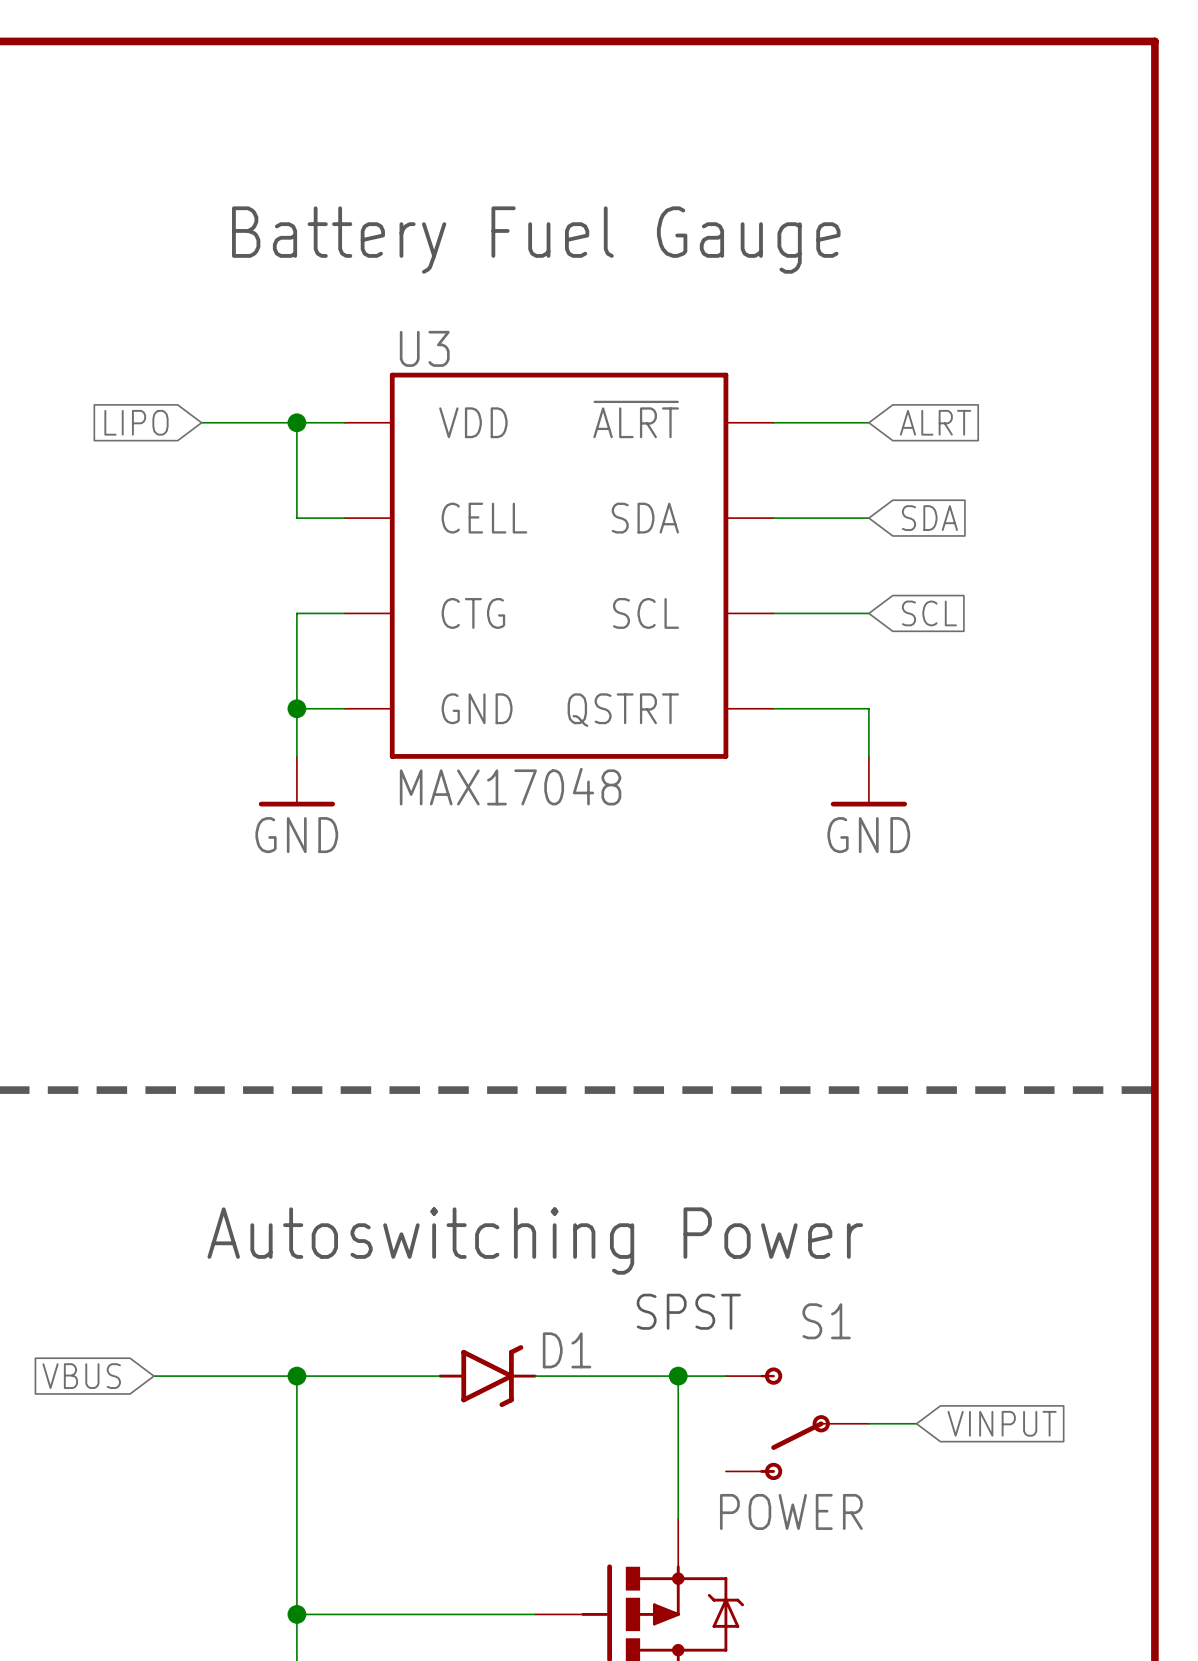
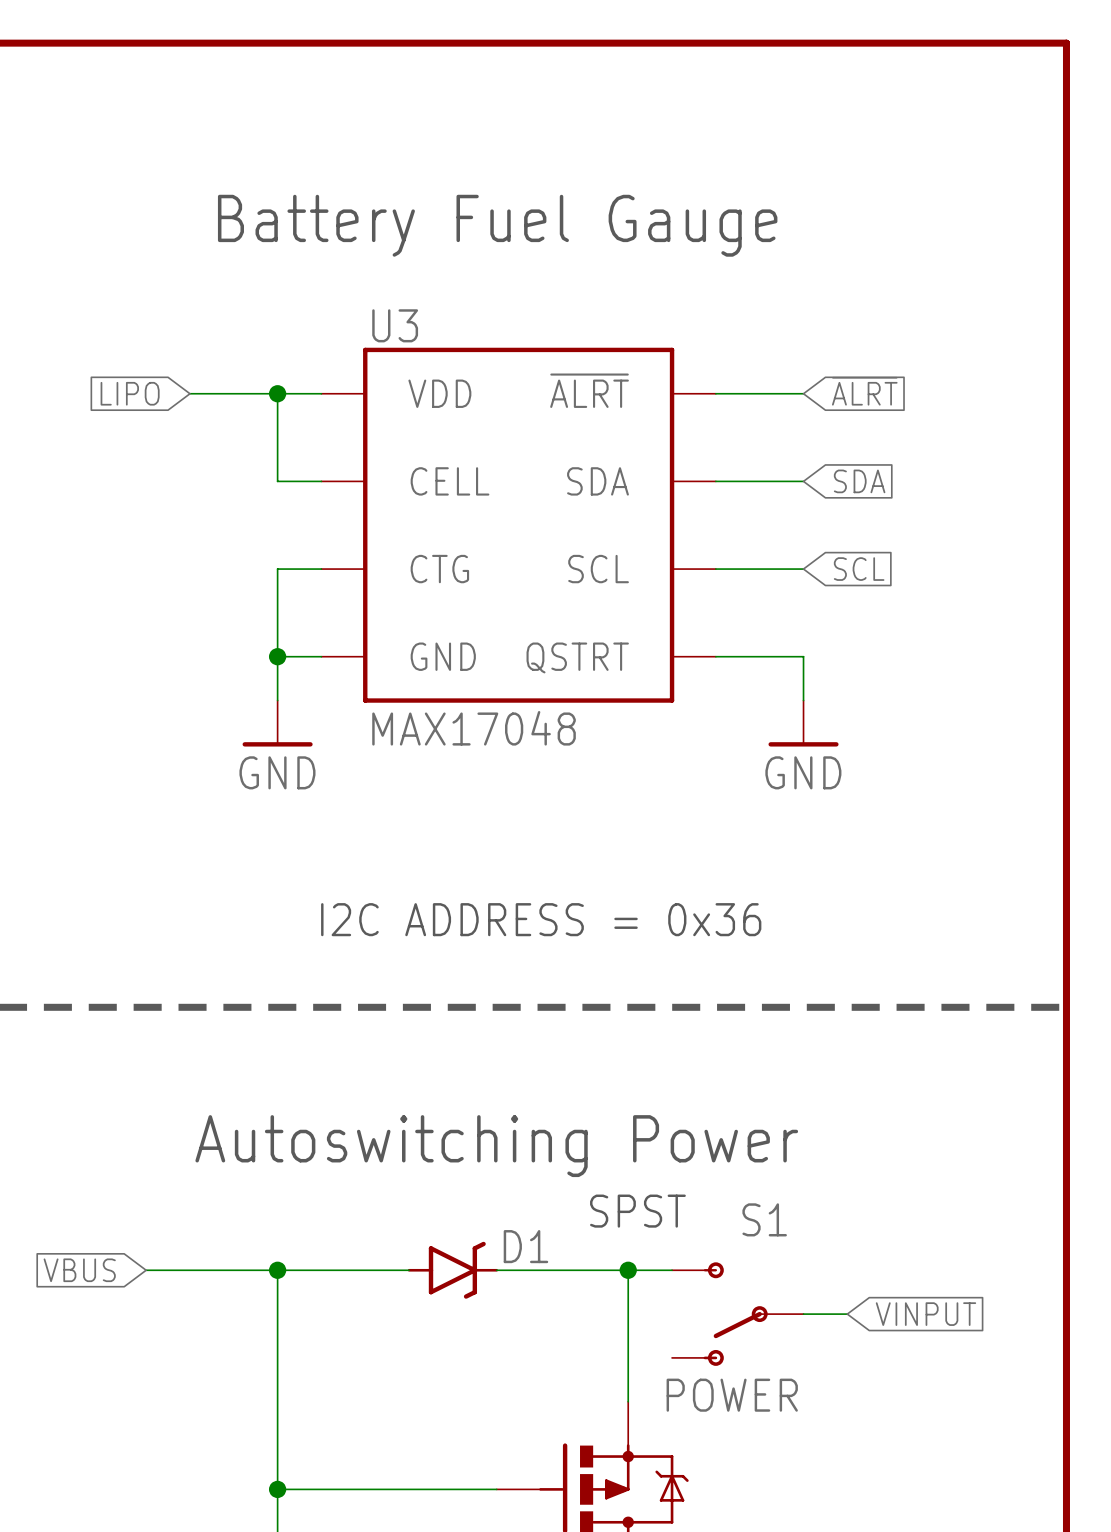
global label: ALRT (935, 422) -> ~{ALRT} (864, 391)
text: none -> I2C ADDRESS = 0x36 (541, 919)

